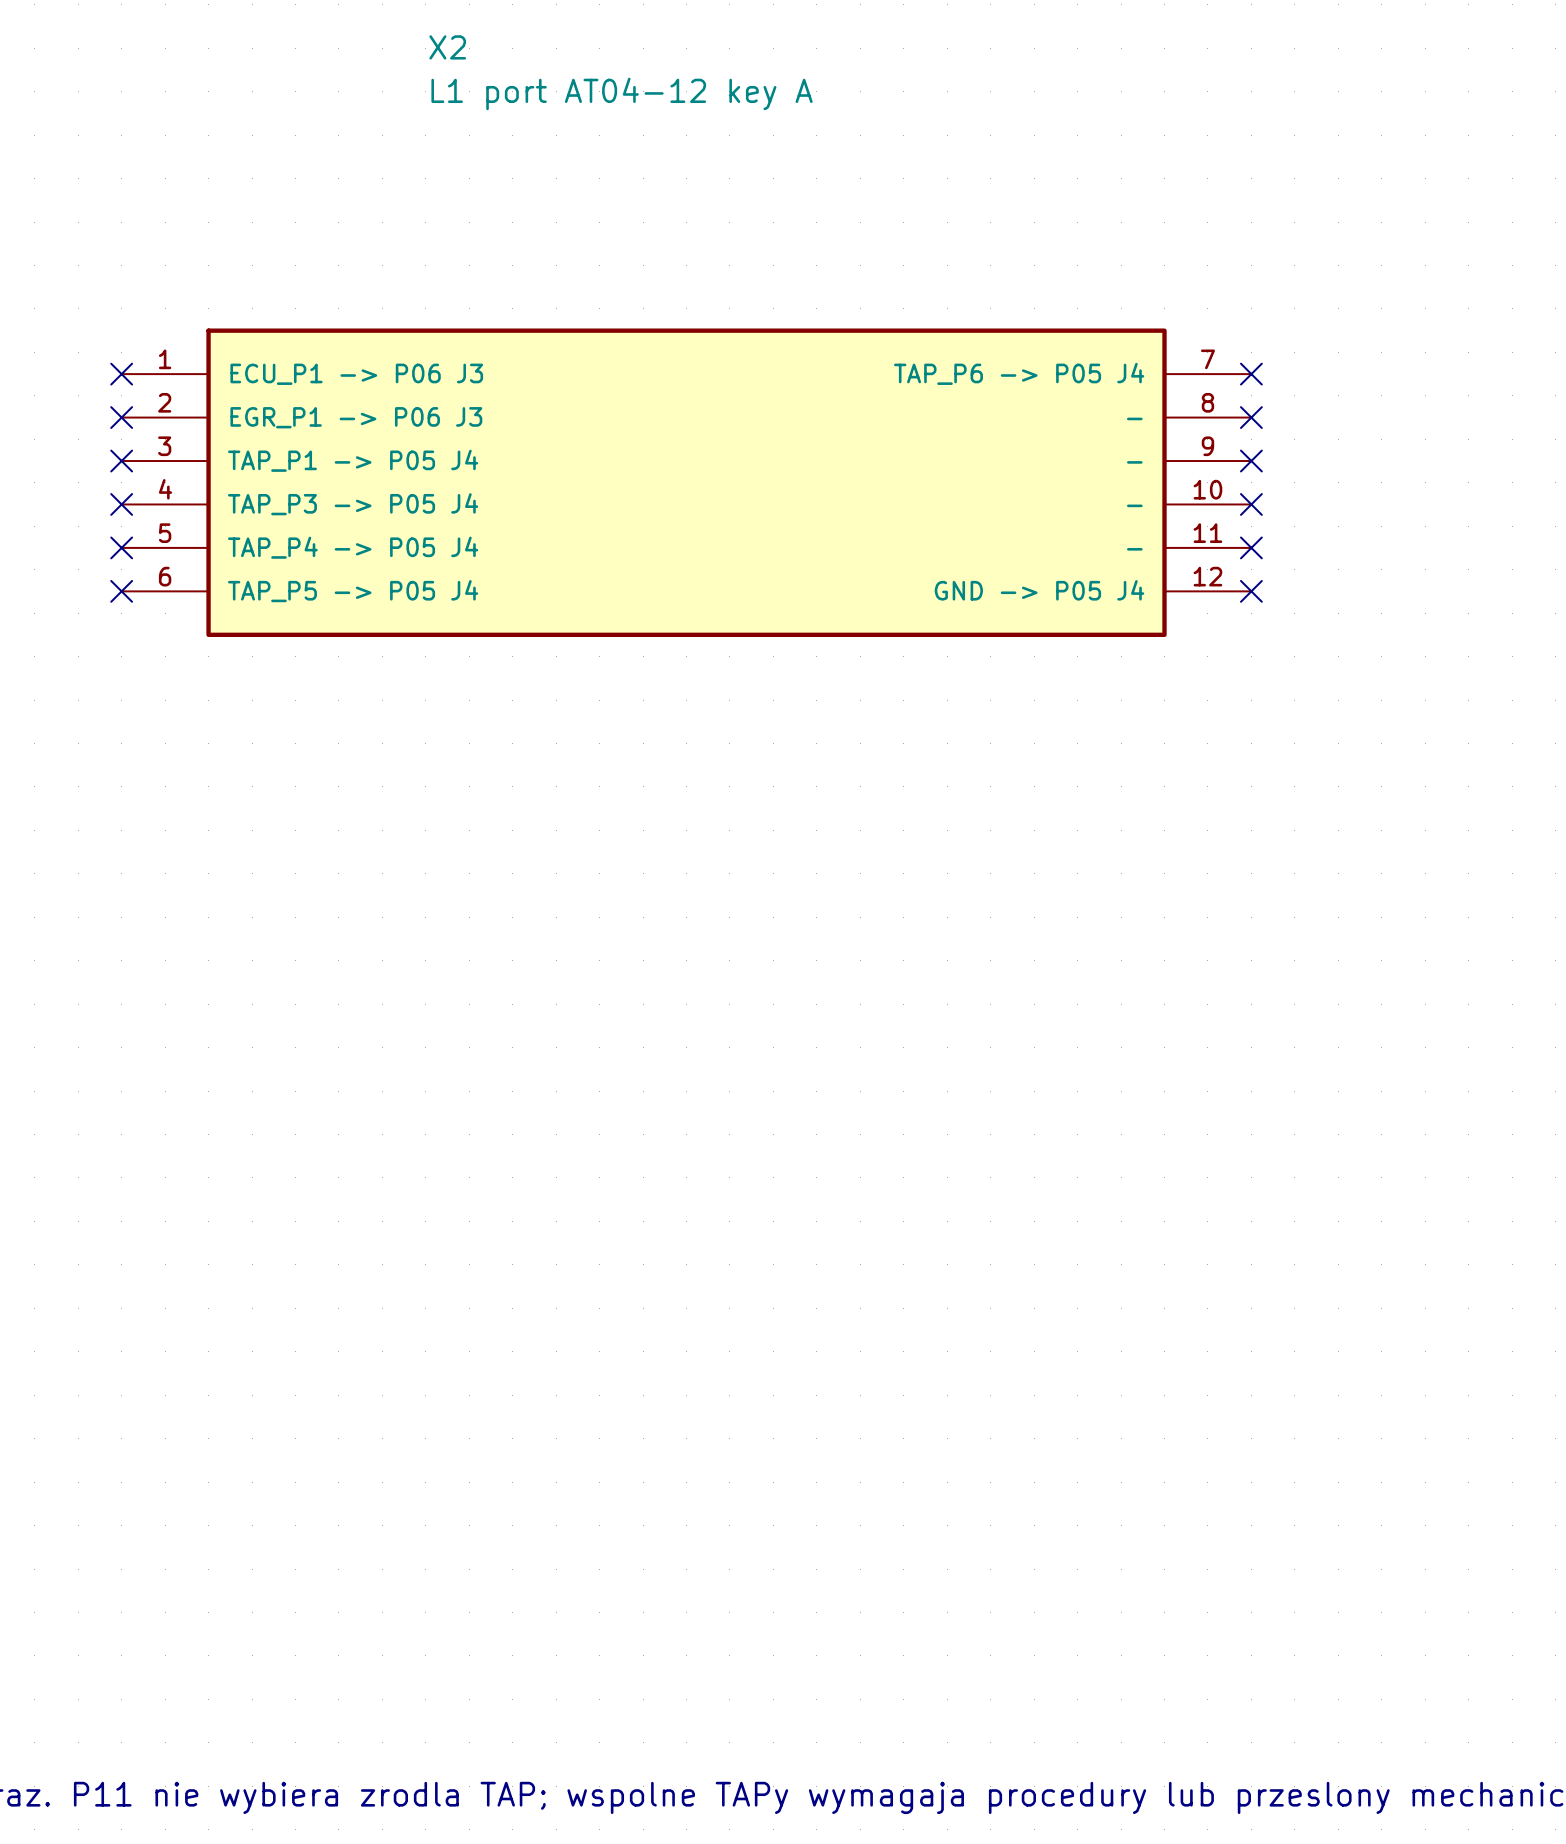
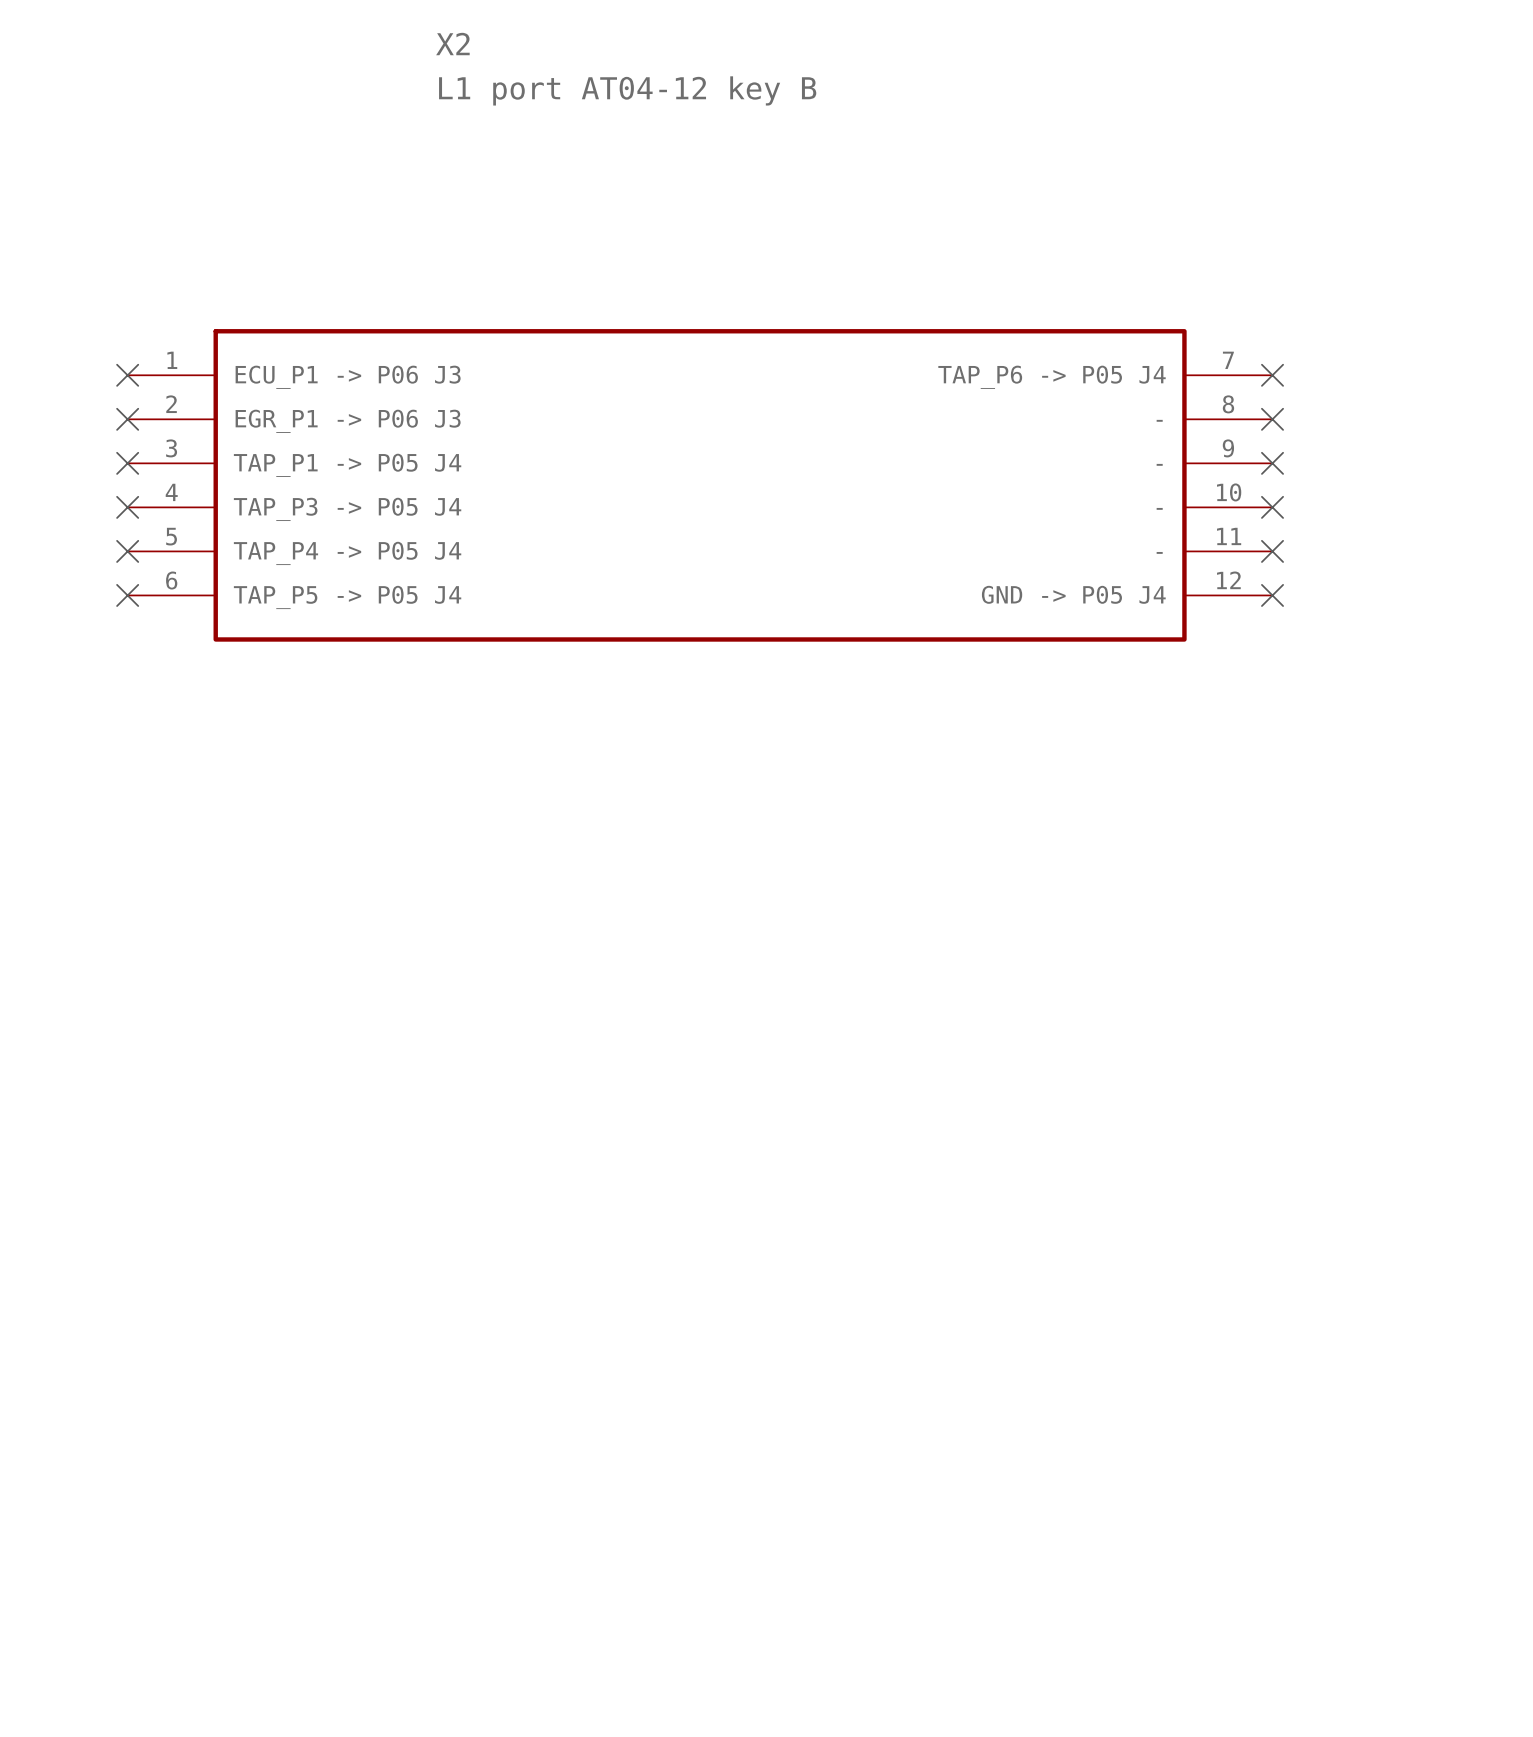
X2 value: L1 port AT04-12 key A (622, 93) -> L1 port AT04-12 key B (627, 90)

